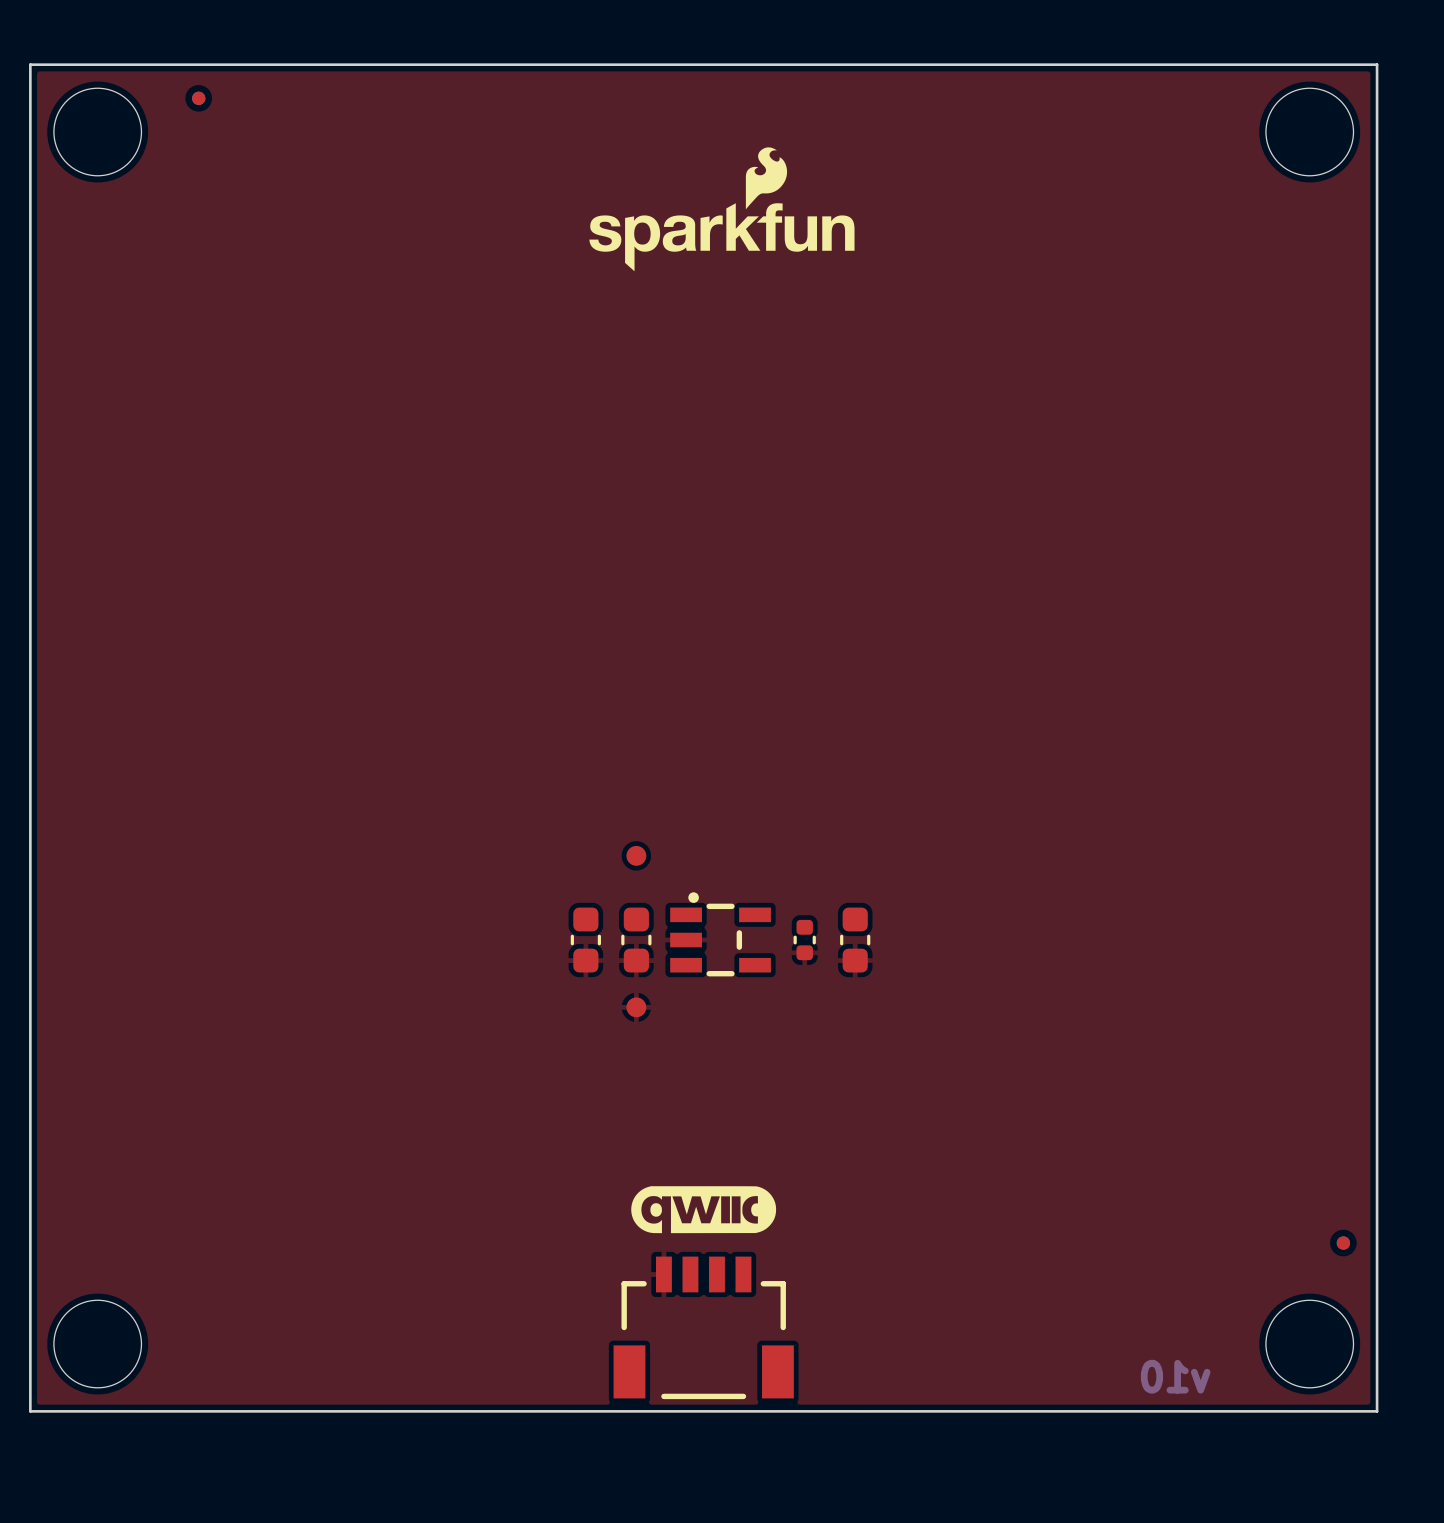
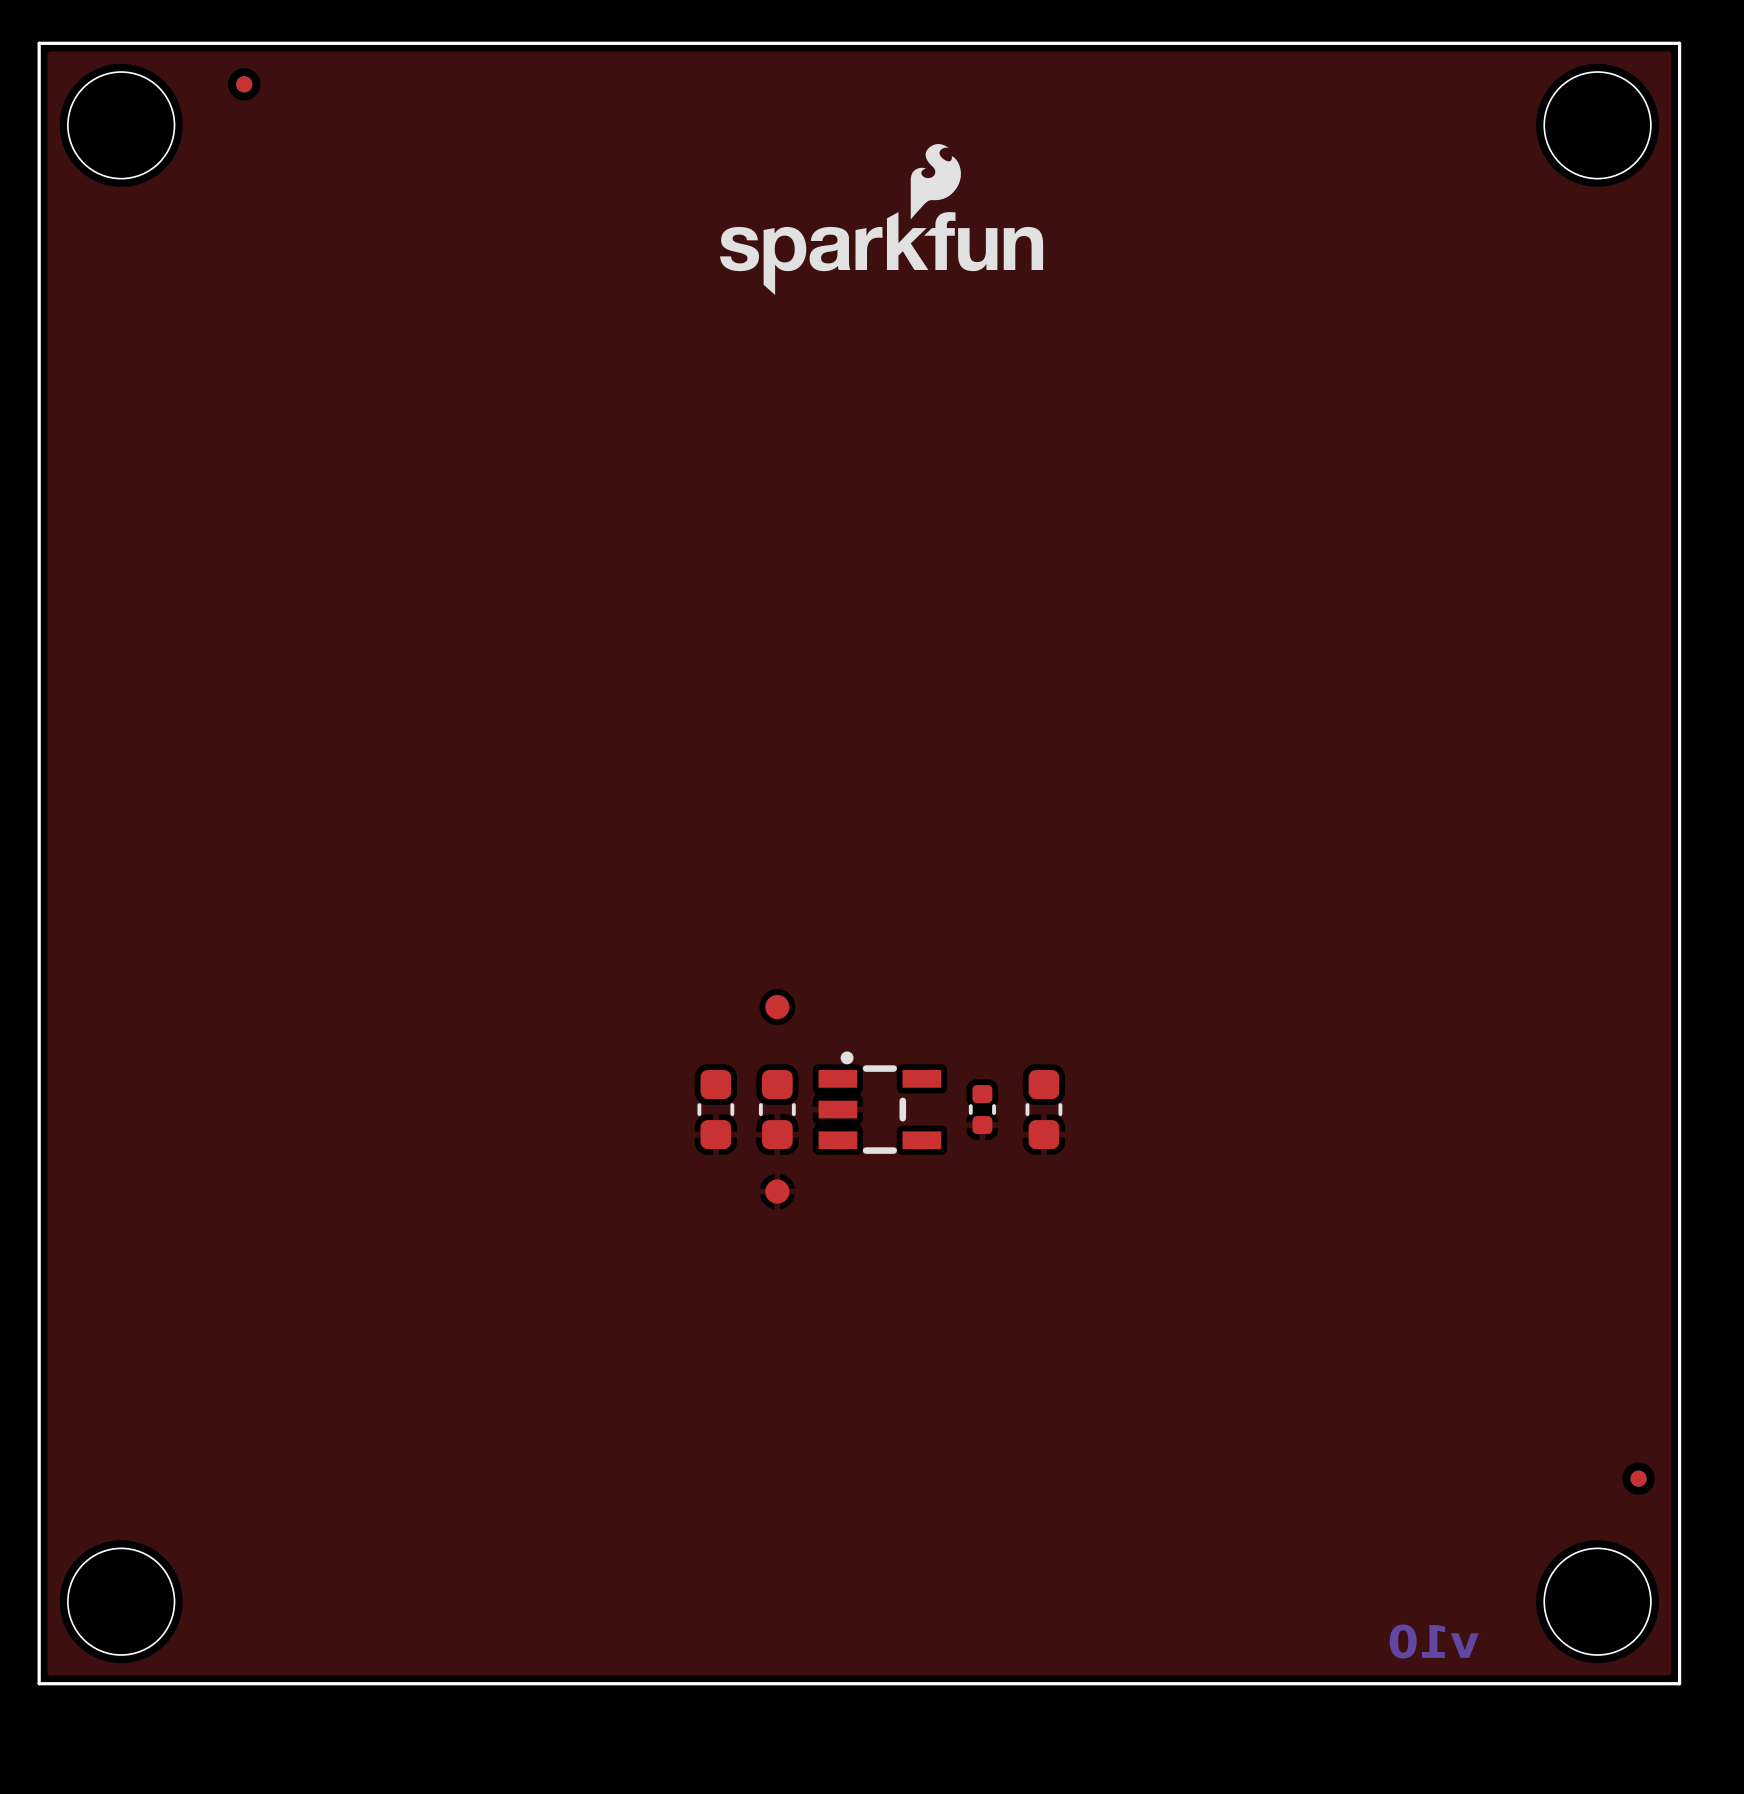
drawing: [631, 1186, 777, 1234] -> none
part: (703, 1327) -> none

